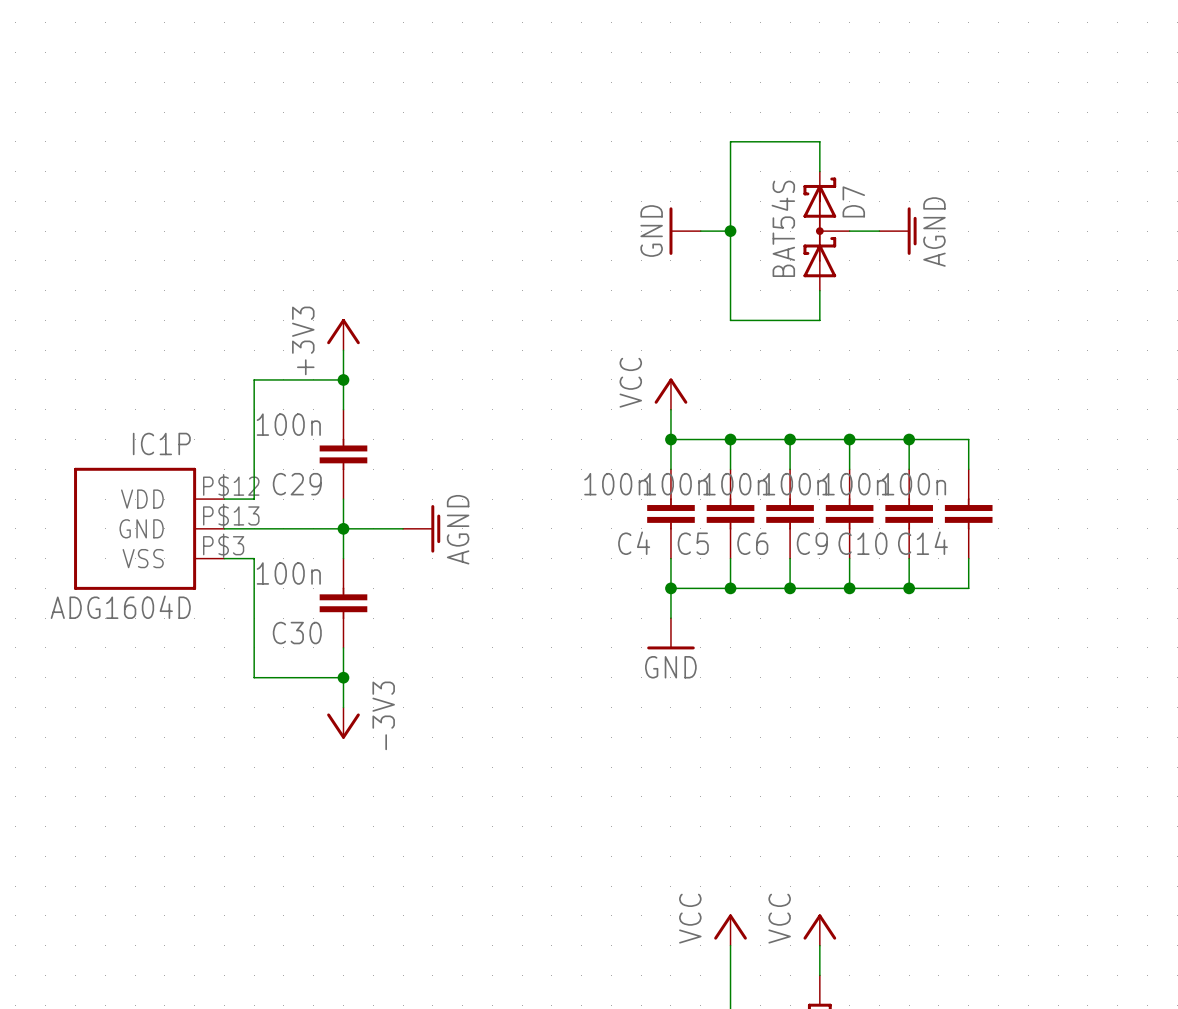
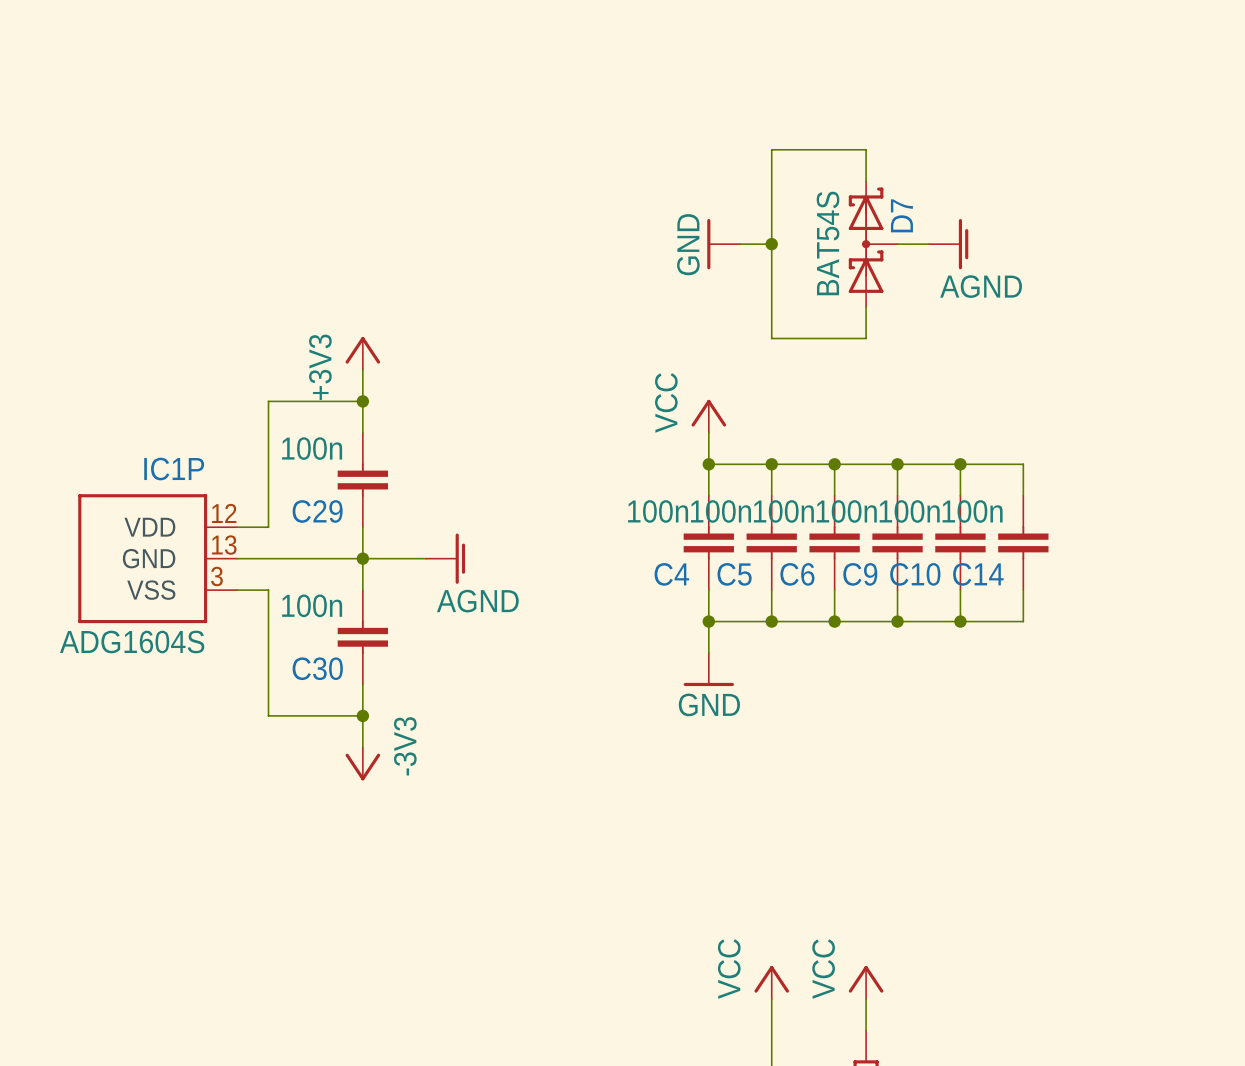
power symbol text rotation: 0° (934, 232) -> 90° clockwise (981, 286)
IC1P pin number: P$12 (231, 486) -> 12 (224, 513)
IC1P pin number: P$13 (231, 515) -> 13 (224, 545)
power symbol text rotation: 0° (458, 529) -> 90° clockwise (477, 601)
IC1P pin number: P$3 (223, 545) -> 3 (216, 576)
IC1P value: ADG1604D (120, 607) -> ADG1604S (132, 642)

